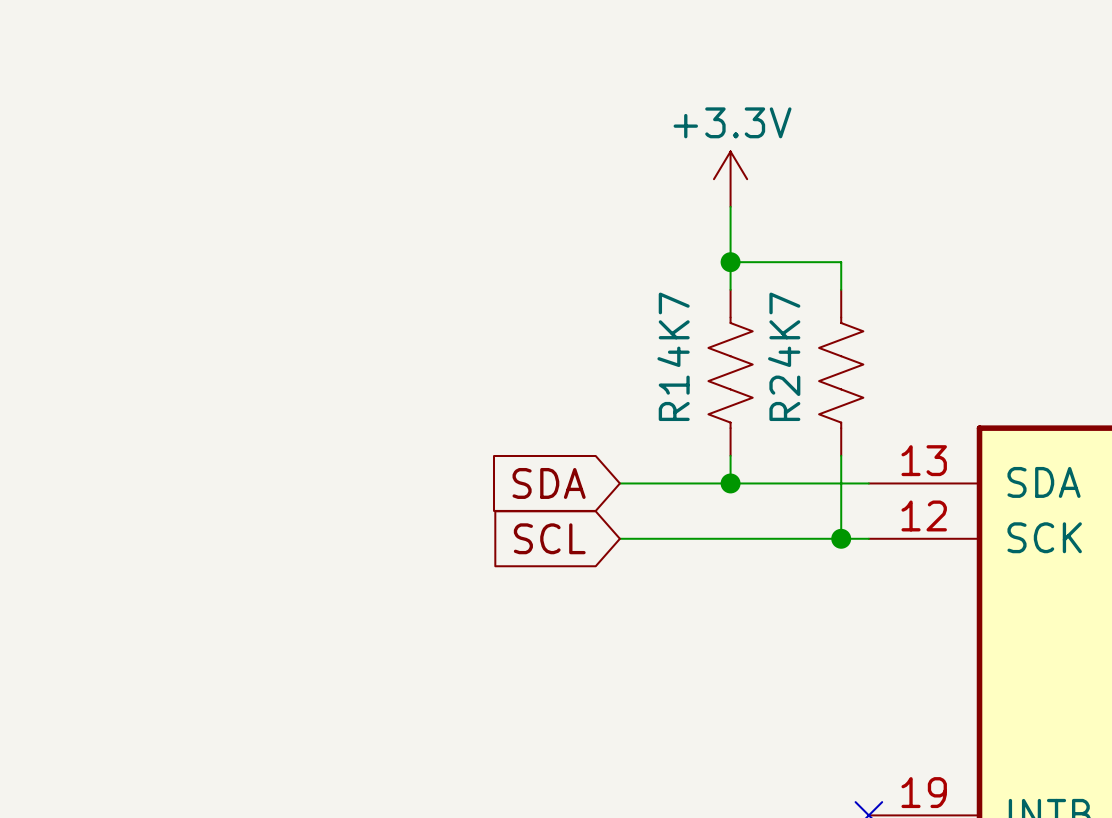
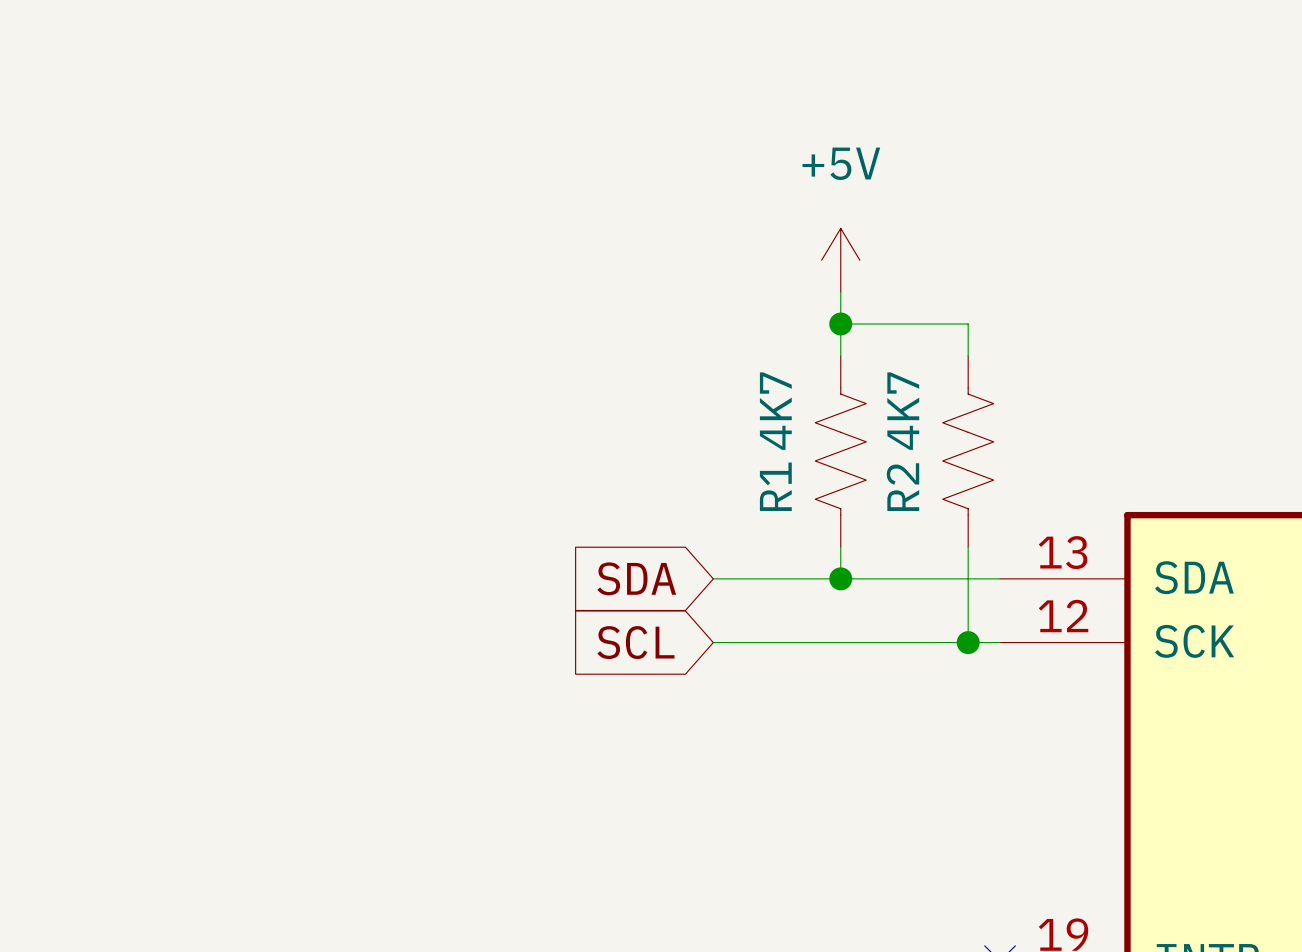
power symbol: +3.3V (730, 179) -> none
power symbol: none -> +5V (840, 260)

